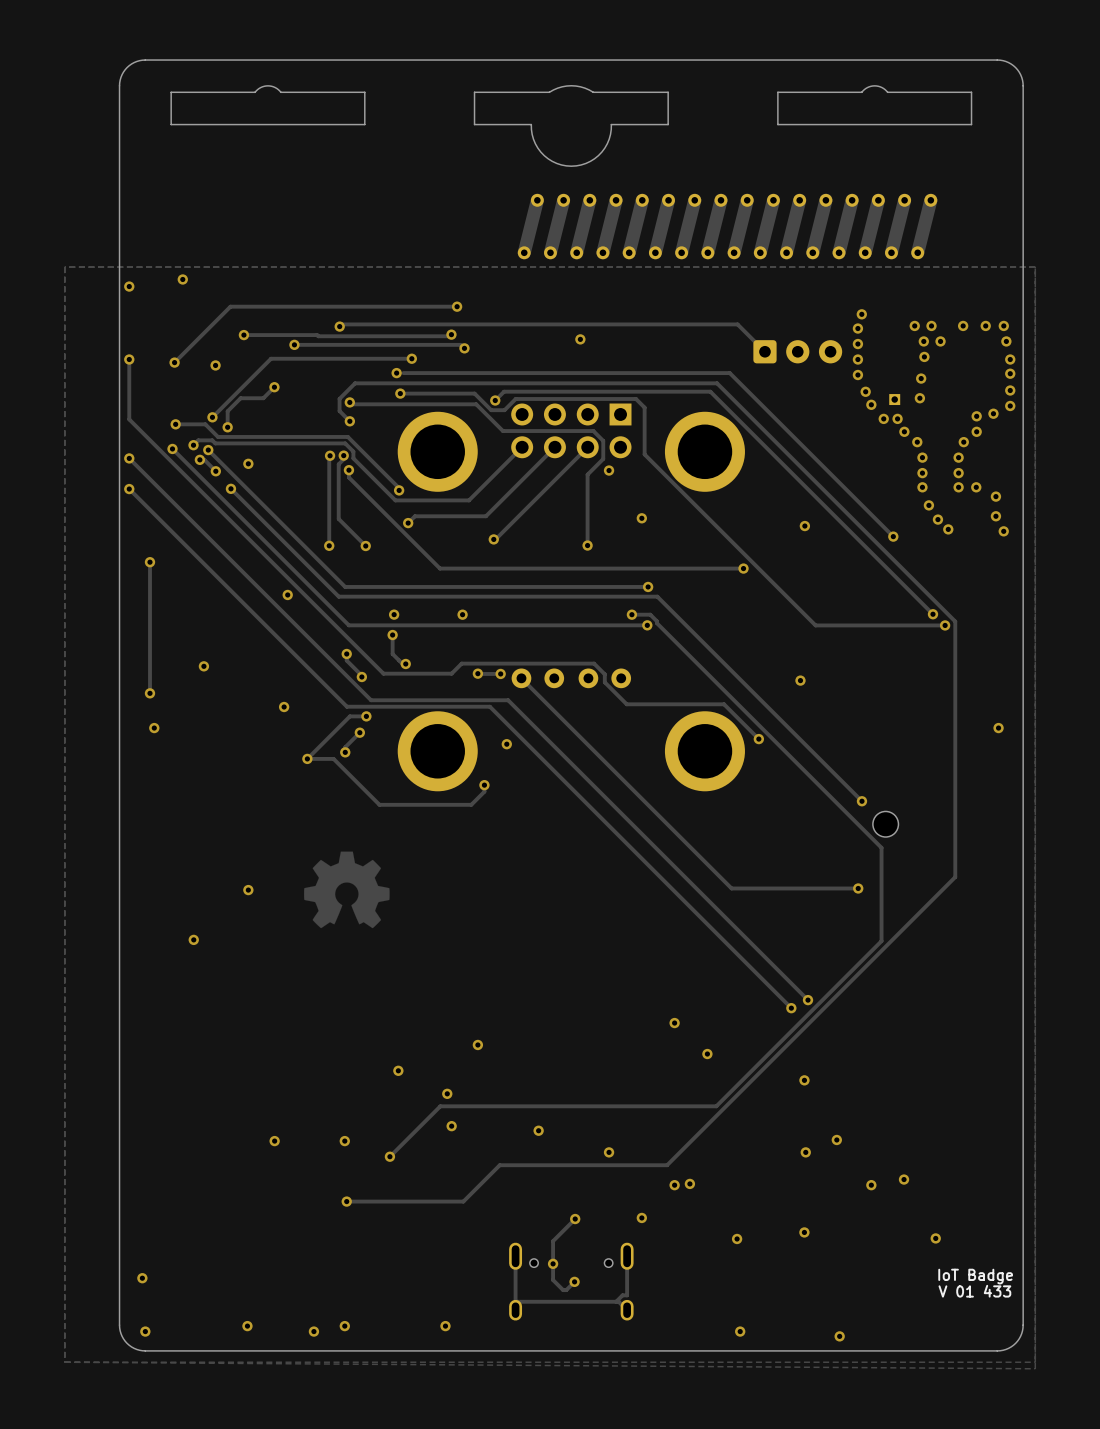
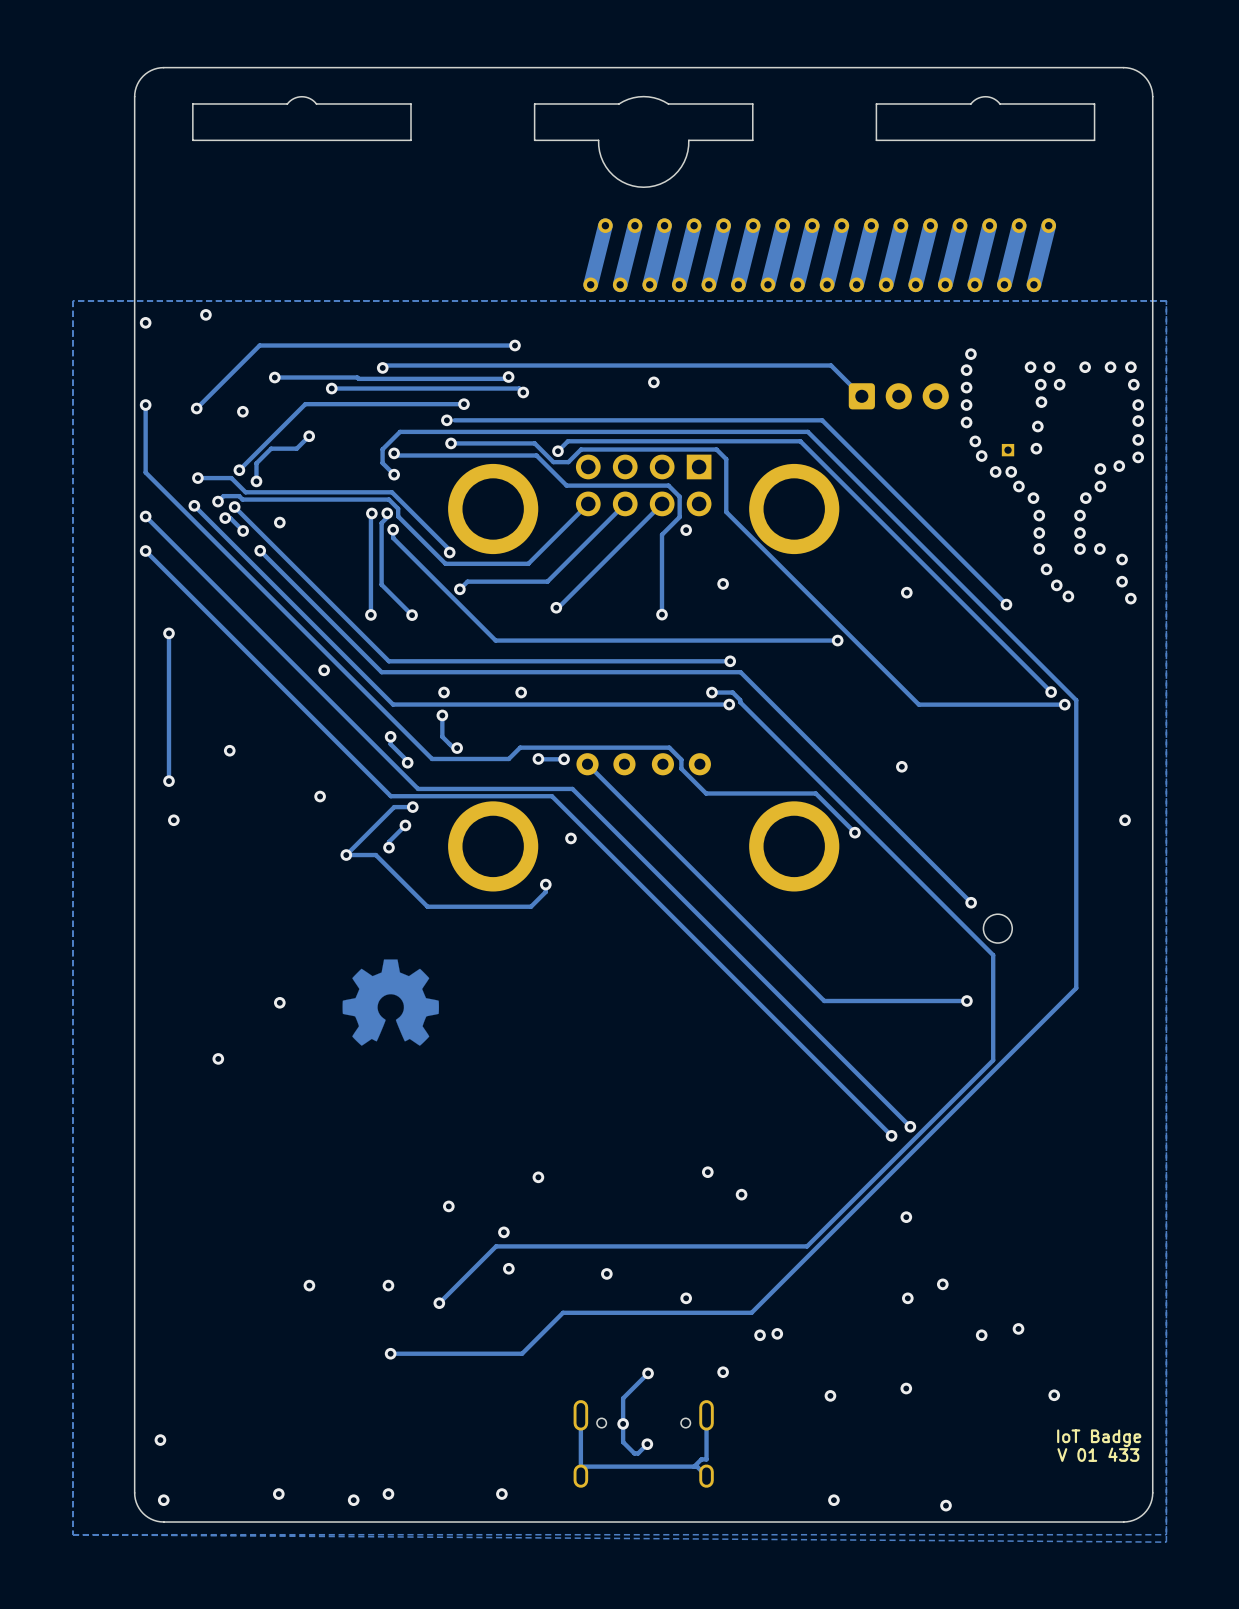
via: (674, 1023) -> none
via: none -> (707, 1172)
via: (707, 1054) -> none
via: none -> (741, 1194)

